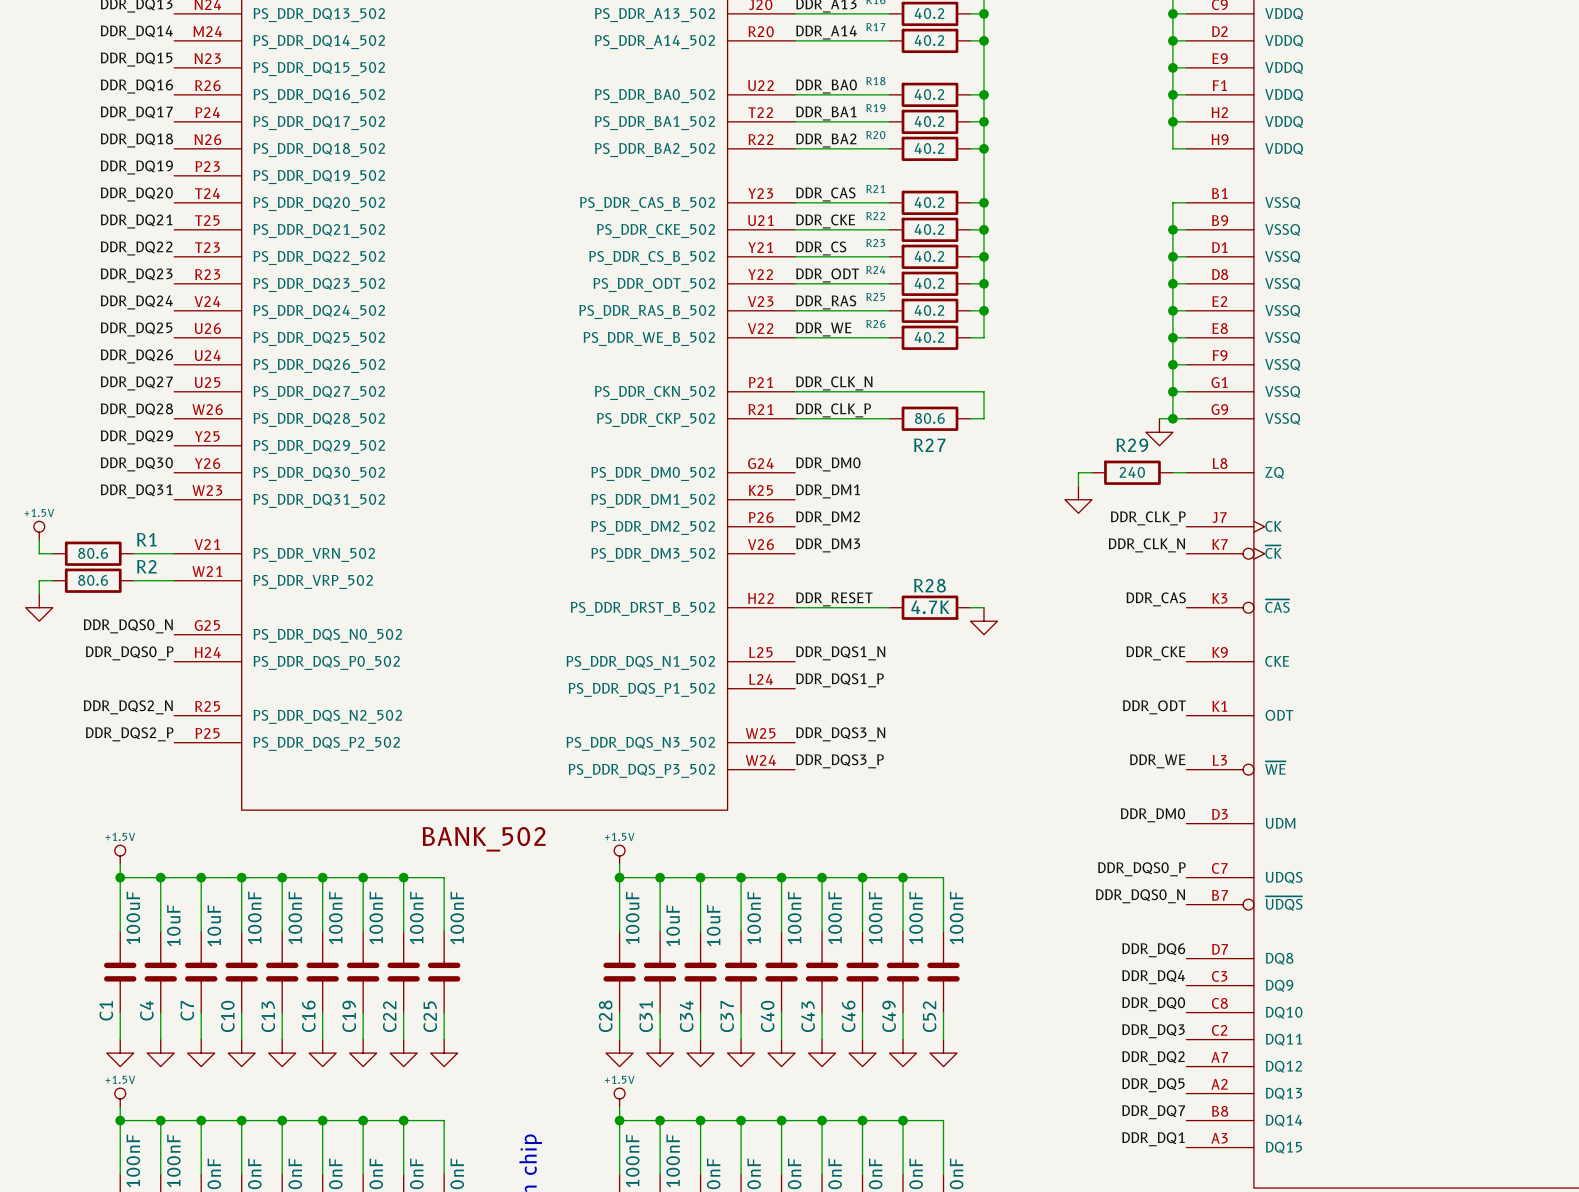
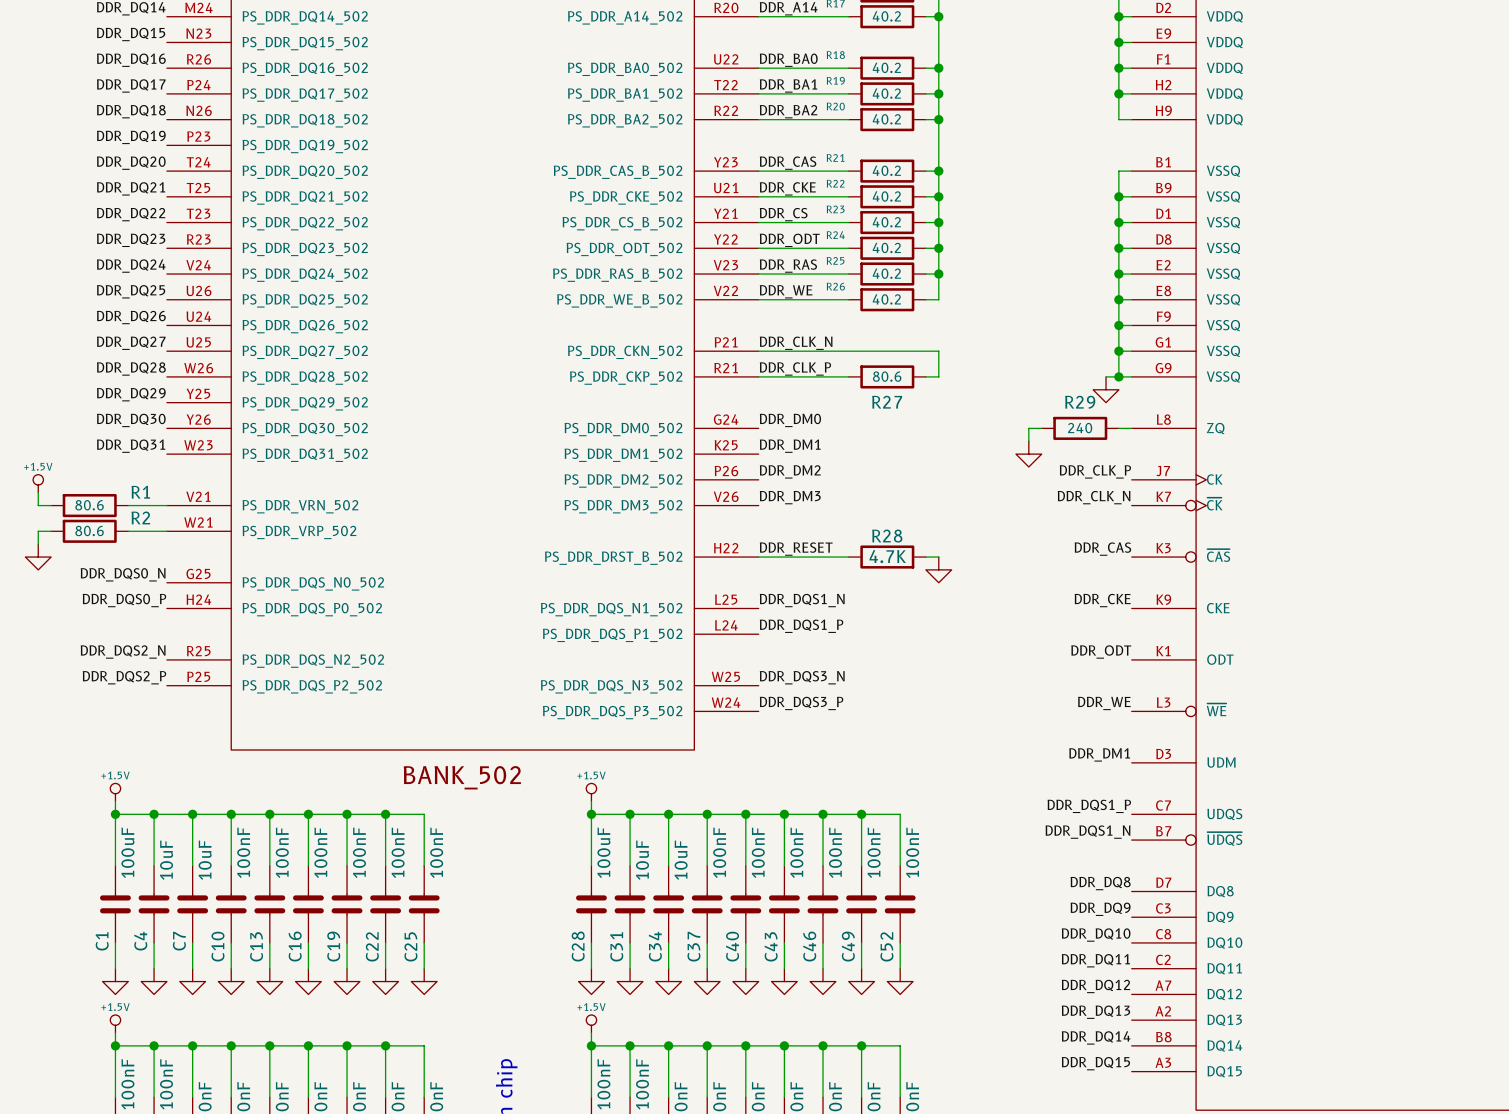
label: DDR_DM0 (1152, 815) -> DDR_DM1 (1099, 754)
label: DDR_DQS0_P (1141, 869) -> DDR_DQS1_P (1089, 806)
label: DDR_DQS0_N (1140, 896) -> DDR_DQS1_N (1087, 832)
label: DDR_DQ6 (1153, 950) -> DDR_DQ8 (1100, 883)
label: DDR_DQ4 (1153, 977) -> DDR_DQ9 (1100, 909)
label: DDR_DQ0 (1153, 1004) -> DDR_DQ10 (1096, 935)
label: DDR_DQ3 (1153, 1031) -> DDR_DQ11 (1095, 960)
label: DDR_DQ2 (1153, 1058) -> DDR_DQ12 (1095, 986)
label: DDR_DQ5 (1153, 1085) -> DDR_DQ13 (1095, 1012)
label: DDR_DQ7 (1153, 1112) -> DDR_DQ14 (1096, 1037)
label: DDR_DQ1 (1153, 1139) -> DDR_DQ15 (1095, 1063)

